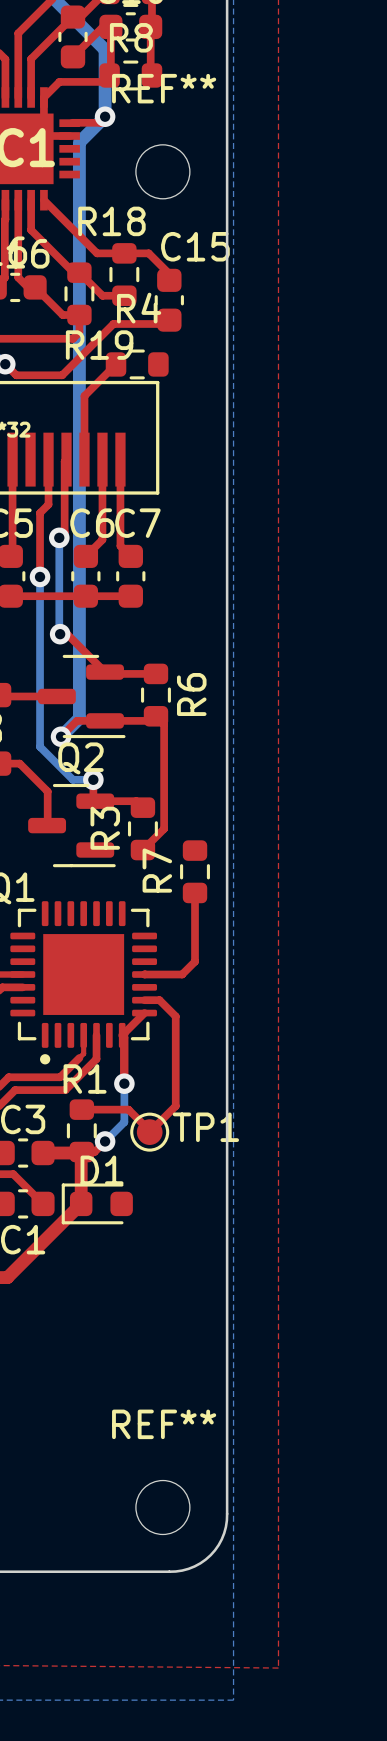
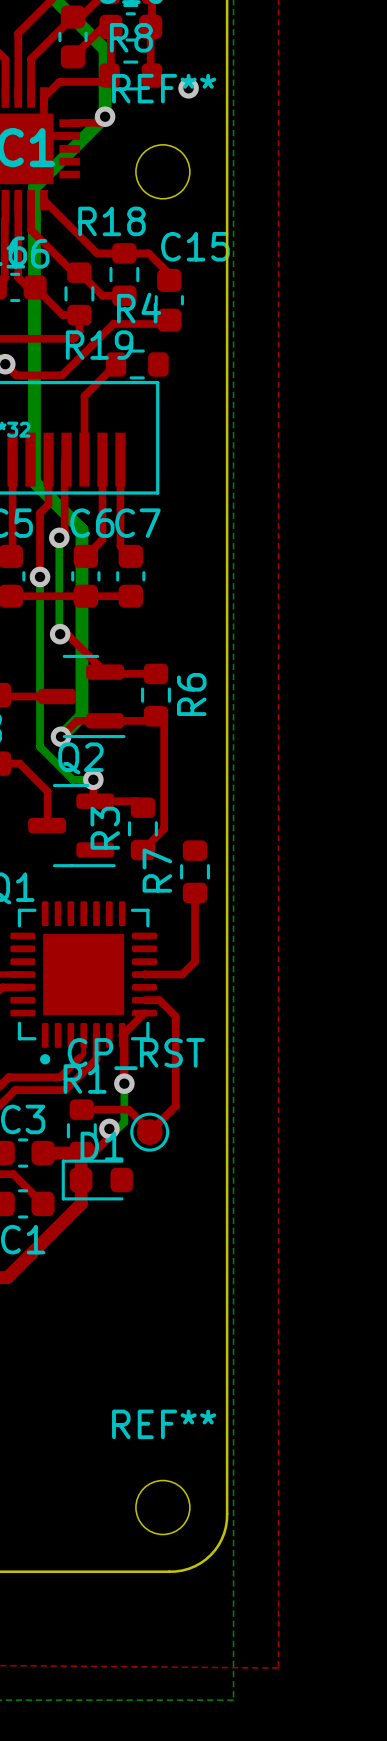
via: none -> (188, 88)
bottom track: (79, 142) (79, 718) -> (80, 141) (34, 187) (34, 482) (81, 529) (81, 715) (79, 718)
TP1 name: TP1 (205, 1127) -> CP_RST (136, 1054)
via position: (105, 1141) -> (109, 1128)
D1 position: (97, 1203) -> (97, 1180)

